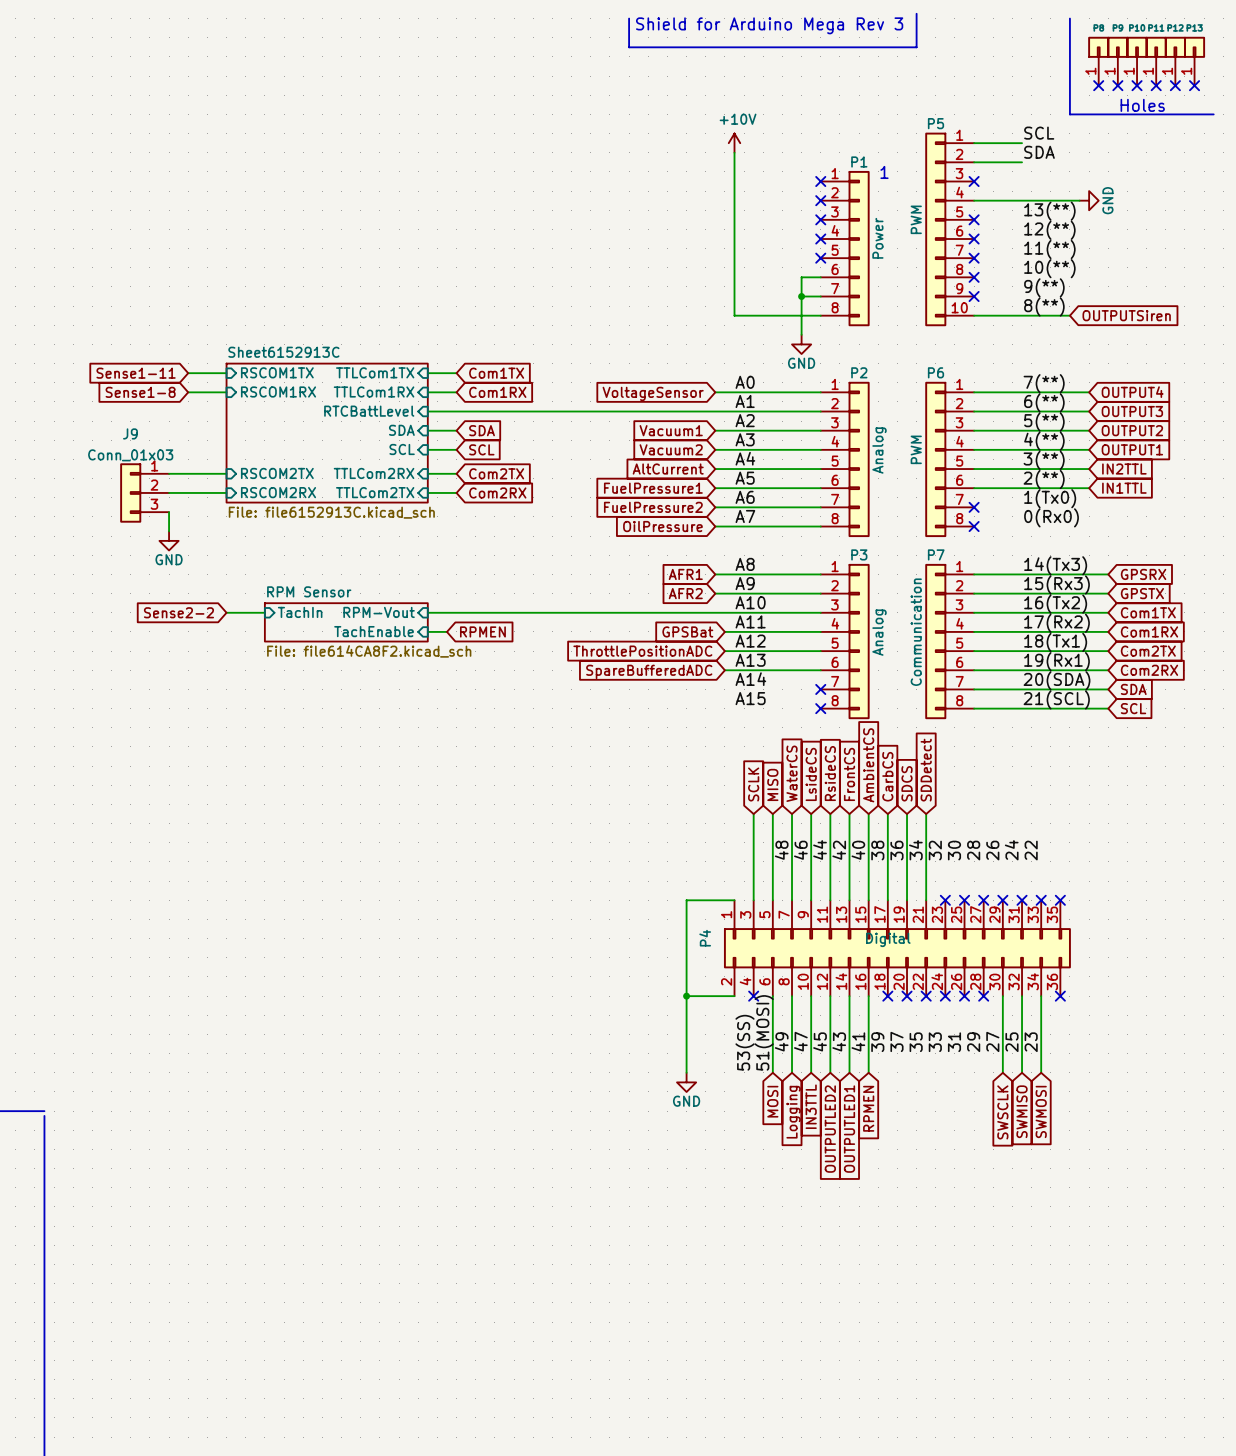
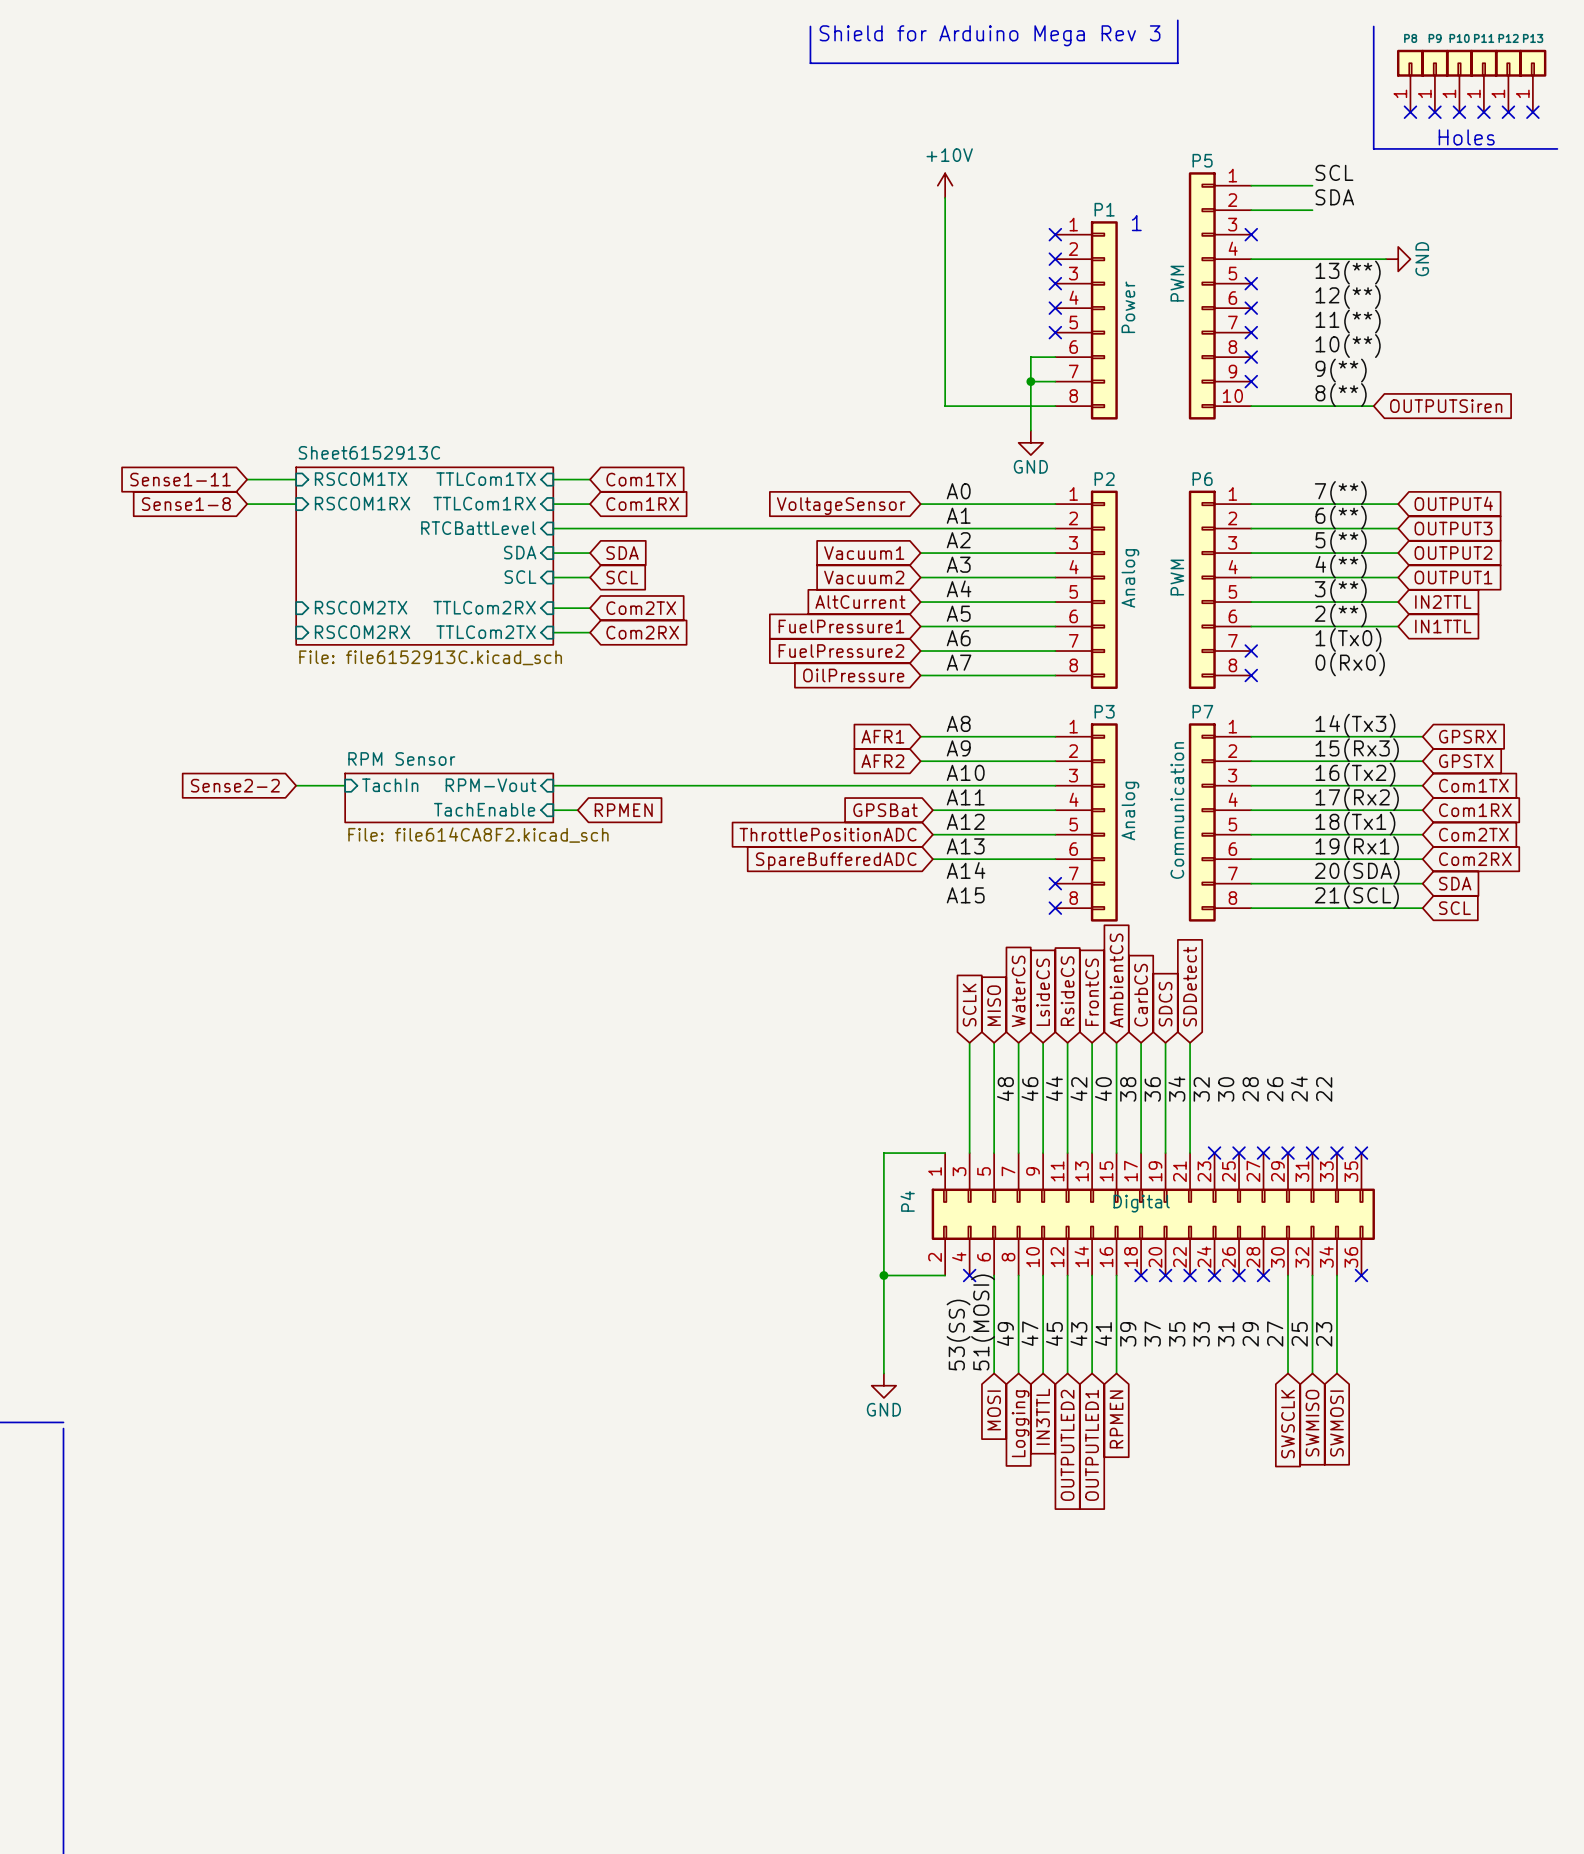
wire: (169, 473) (226, 473) -> none
J9: Conn_01x03 (144, 492) -> none
wire: (169, 492) (226, 492) -> none
wire: (169, 512) (169, 531) -> none
power symbol: GND (169, 540) -> none

